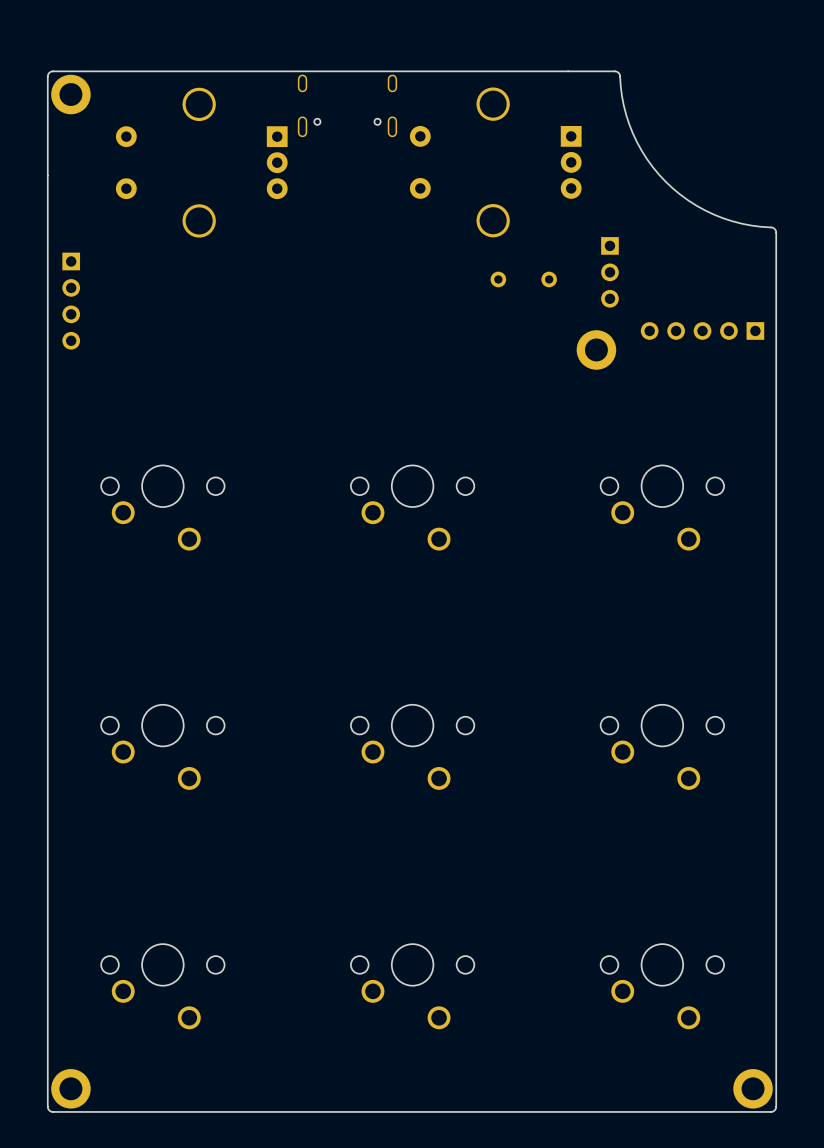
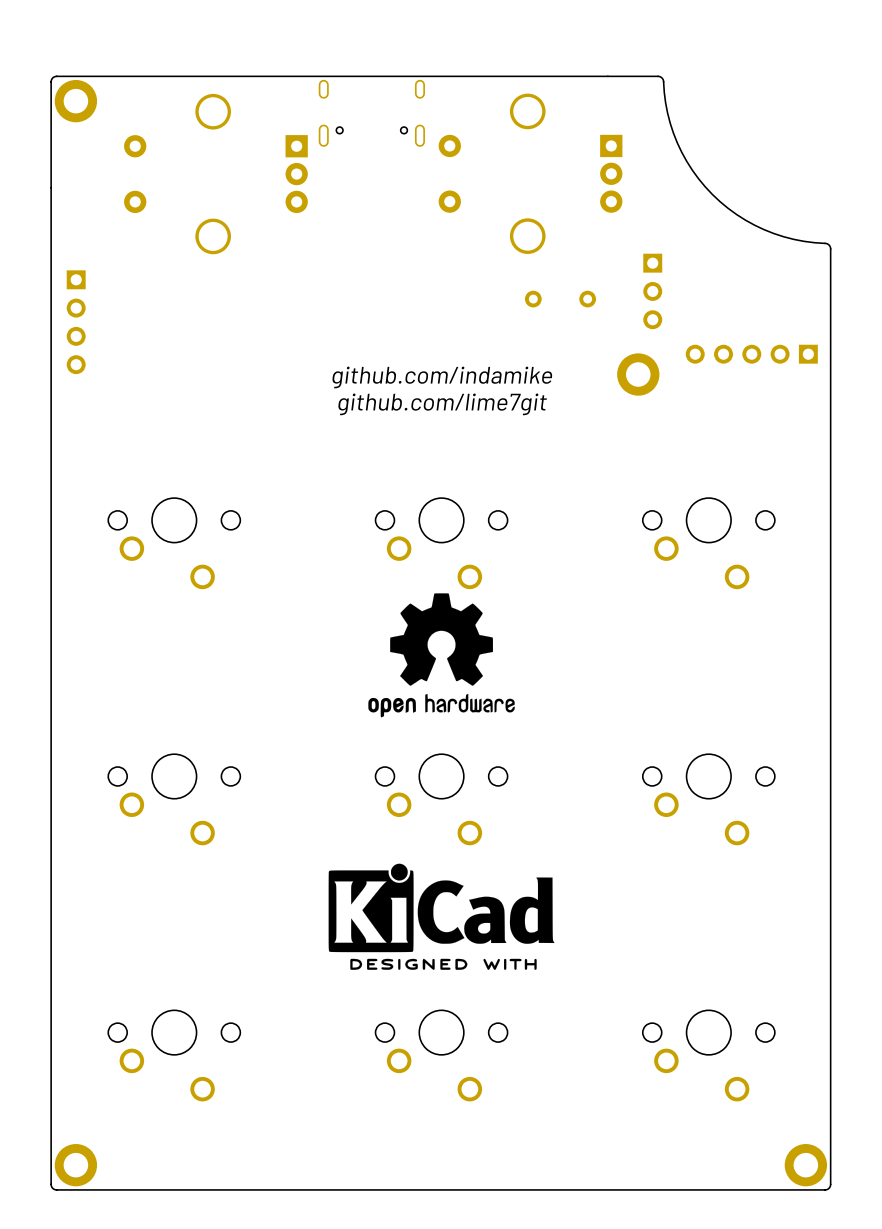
text: none -> github.com/indamike (442, 377)
text: none -> github.com/lime7git (442, 404)
drawing: none -> [368, 593, 515, 718]
drawing: none -> [328, 863, 555, 970]

